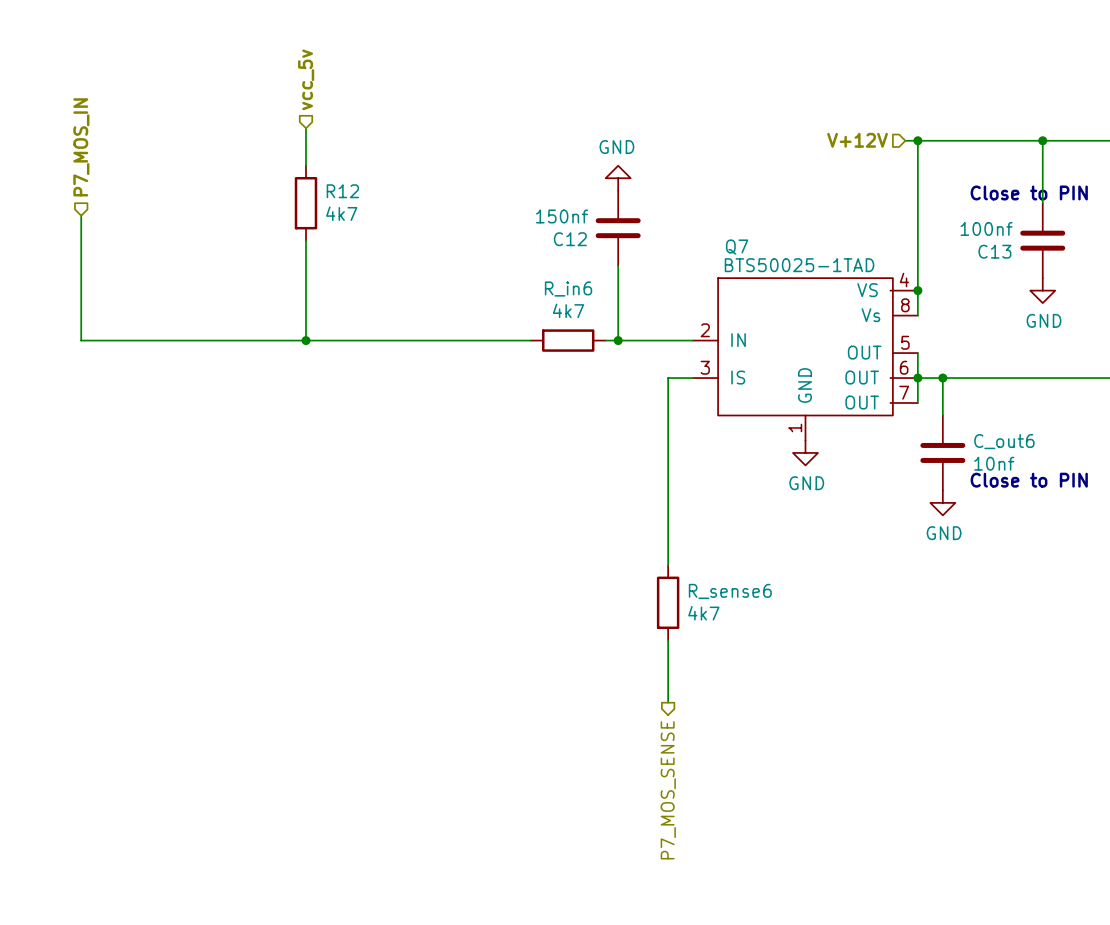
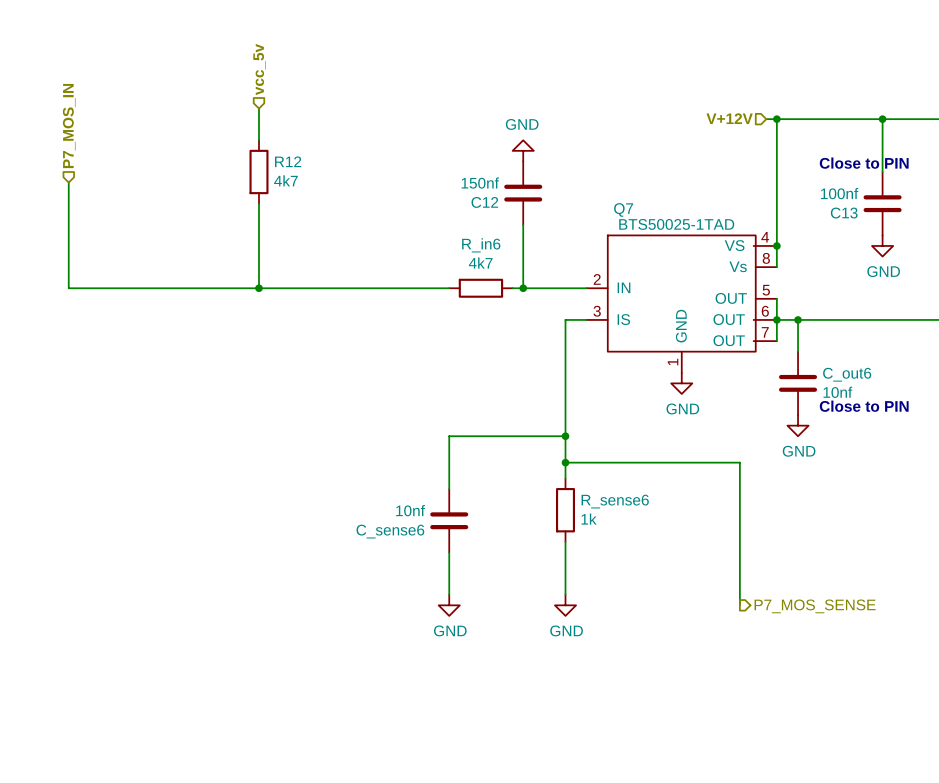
wire: none -> (565, 436) (449, 436) (449, 489)
junction: none -> (565, 436)
wire: none -> (565, 462) (739, 462) (739, 605)
junction: none -> (565, 462)
R_sense6 value: 4k7 (703, 613) -> 1k (589, 519)
C_sense6: none -> 10nf (449, 520)
wire: none -> (449, 552) (449, 594)
power symbol: none -> GND (449, 605)
power symbol: none -> GND (565, 605)
hierarchical label rotation: 0° (668, 790) -> 90° counterclockwise (815, 606)
hierarchical label position: P7_MOS_SENSE (668, 790) -> P7_MOS_SENSE (815, 606)

